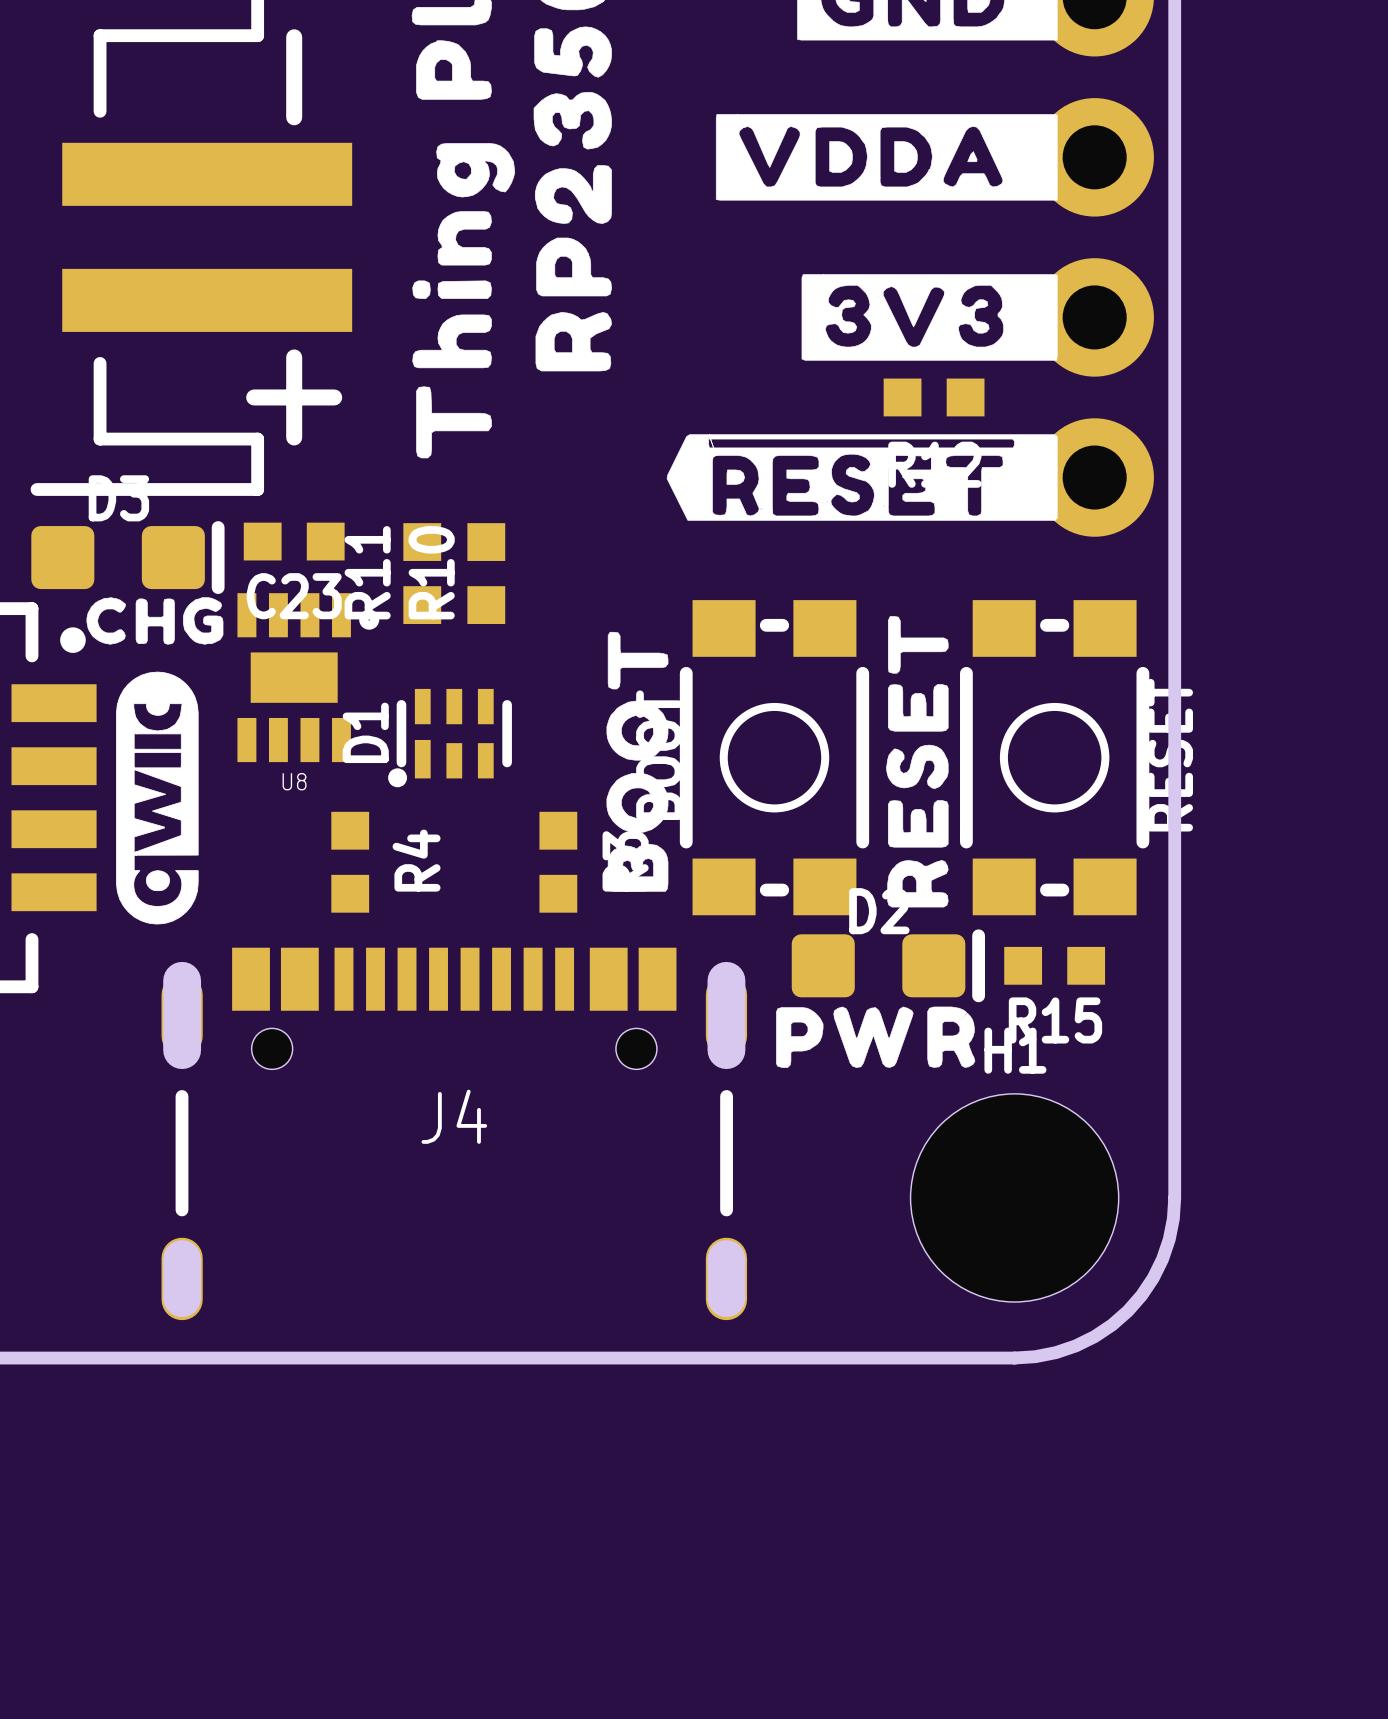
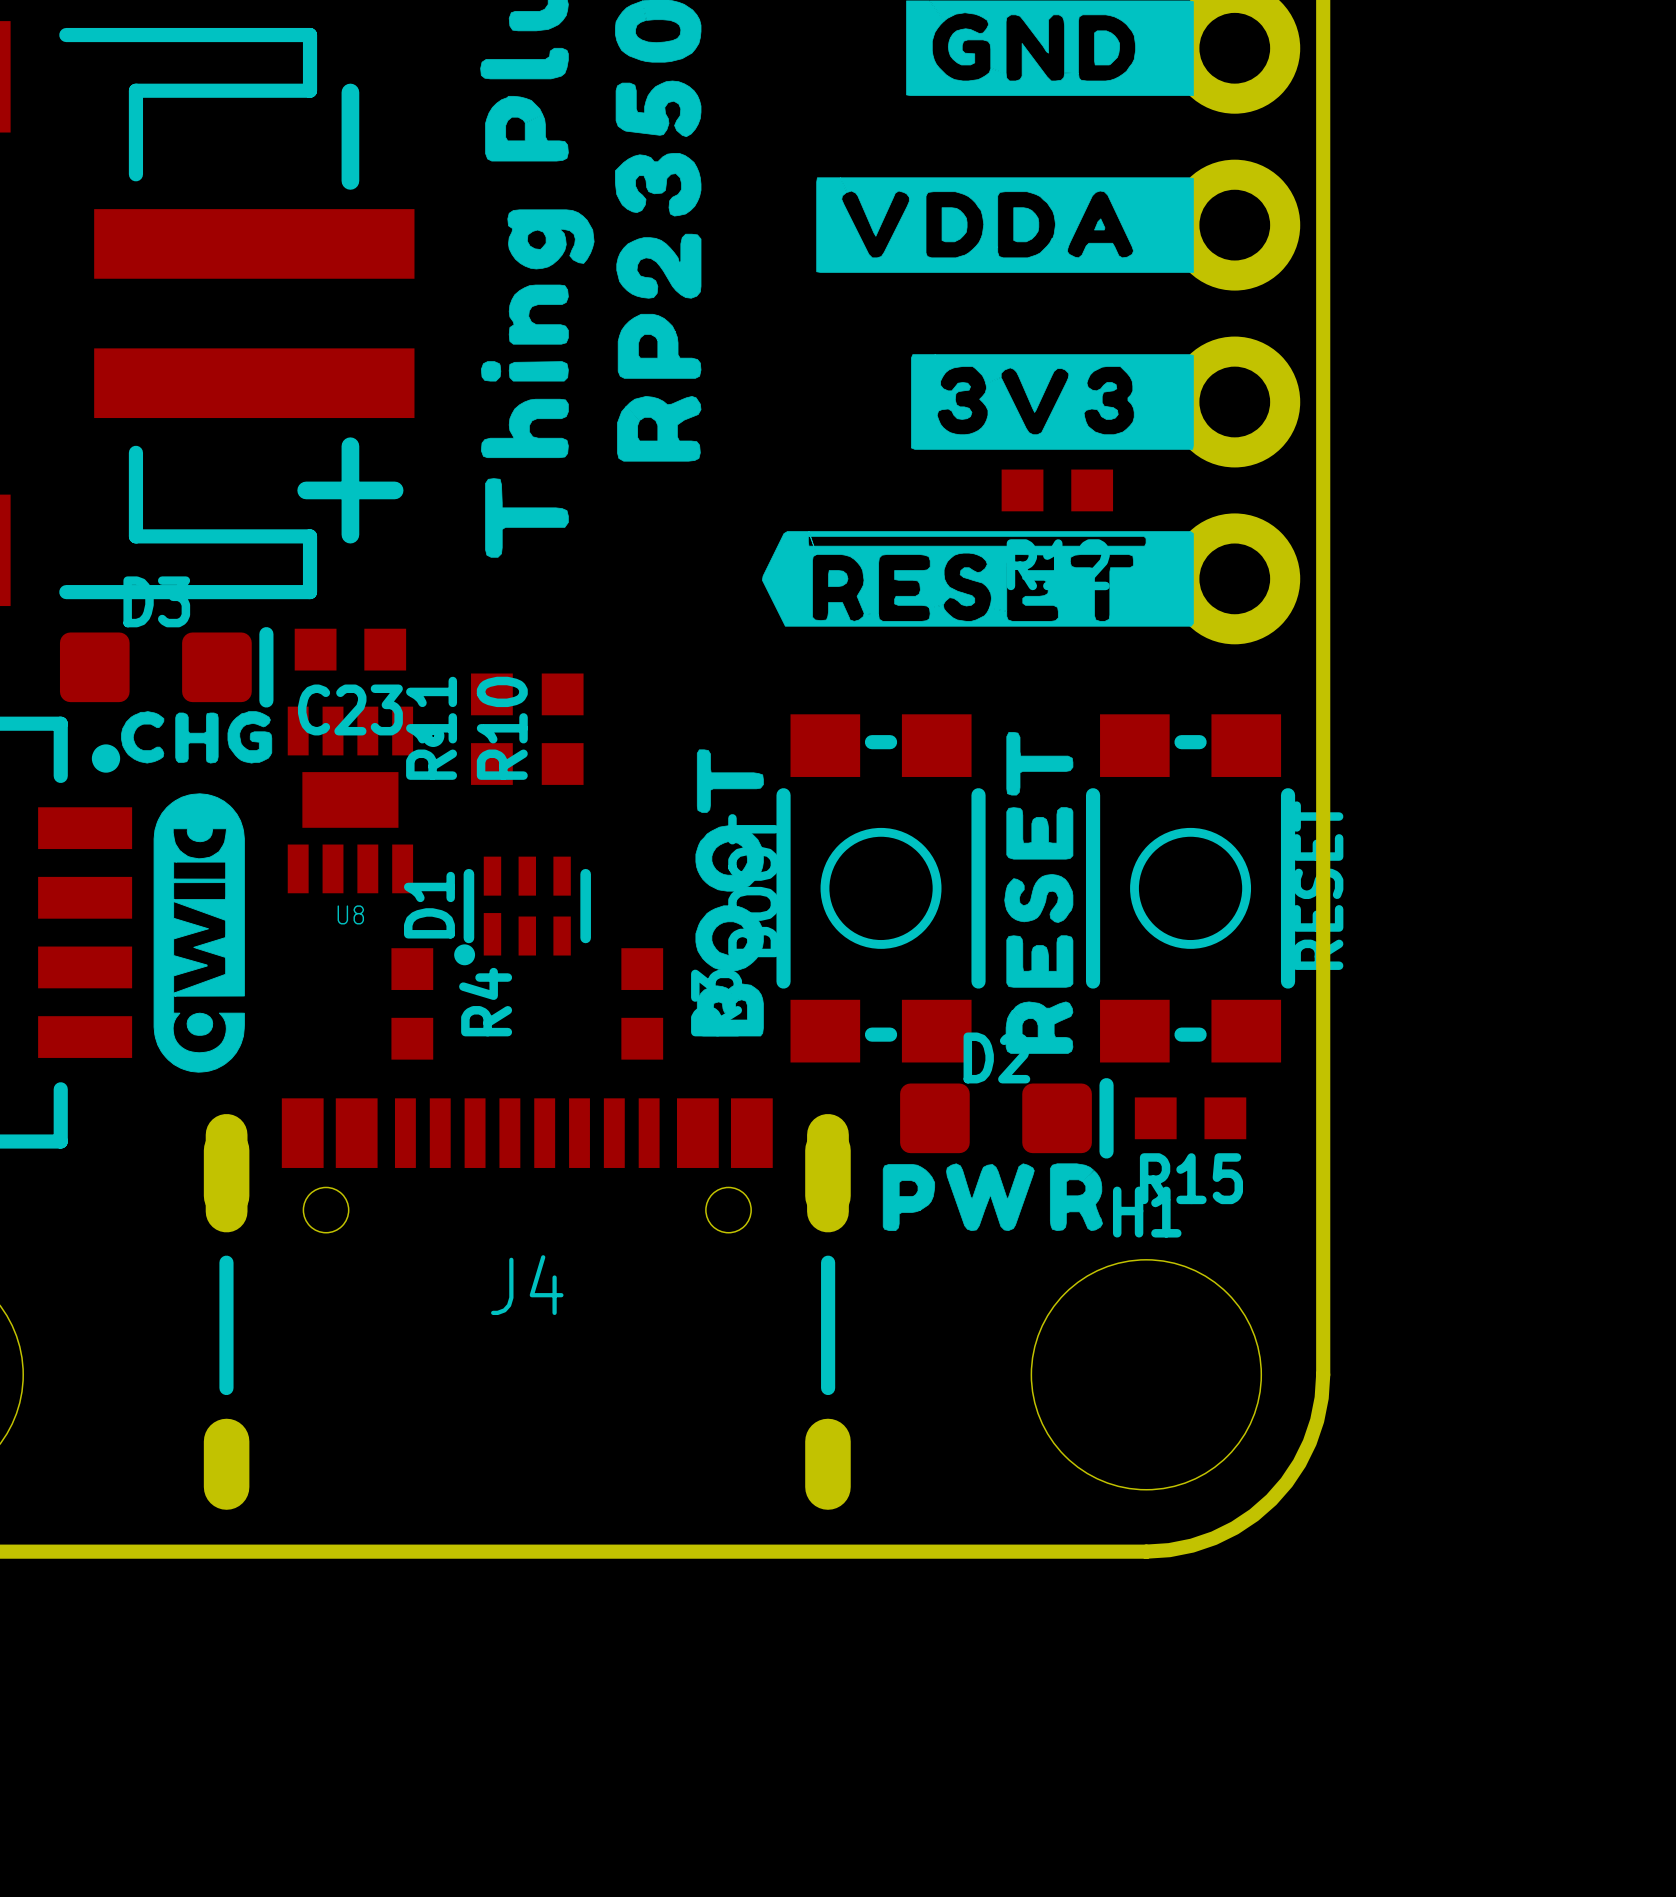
R11 position: (422, 573) -> (491, 729)
R10 position: (486, 573) -> (562, 729)
D1 position: (450, 738) -> (522, 910)

